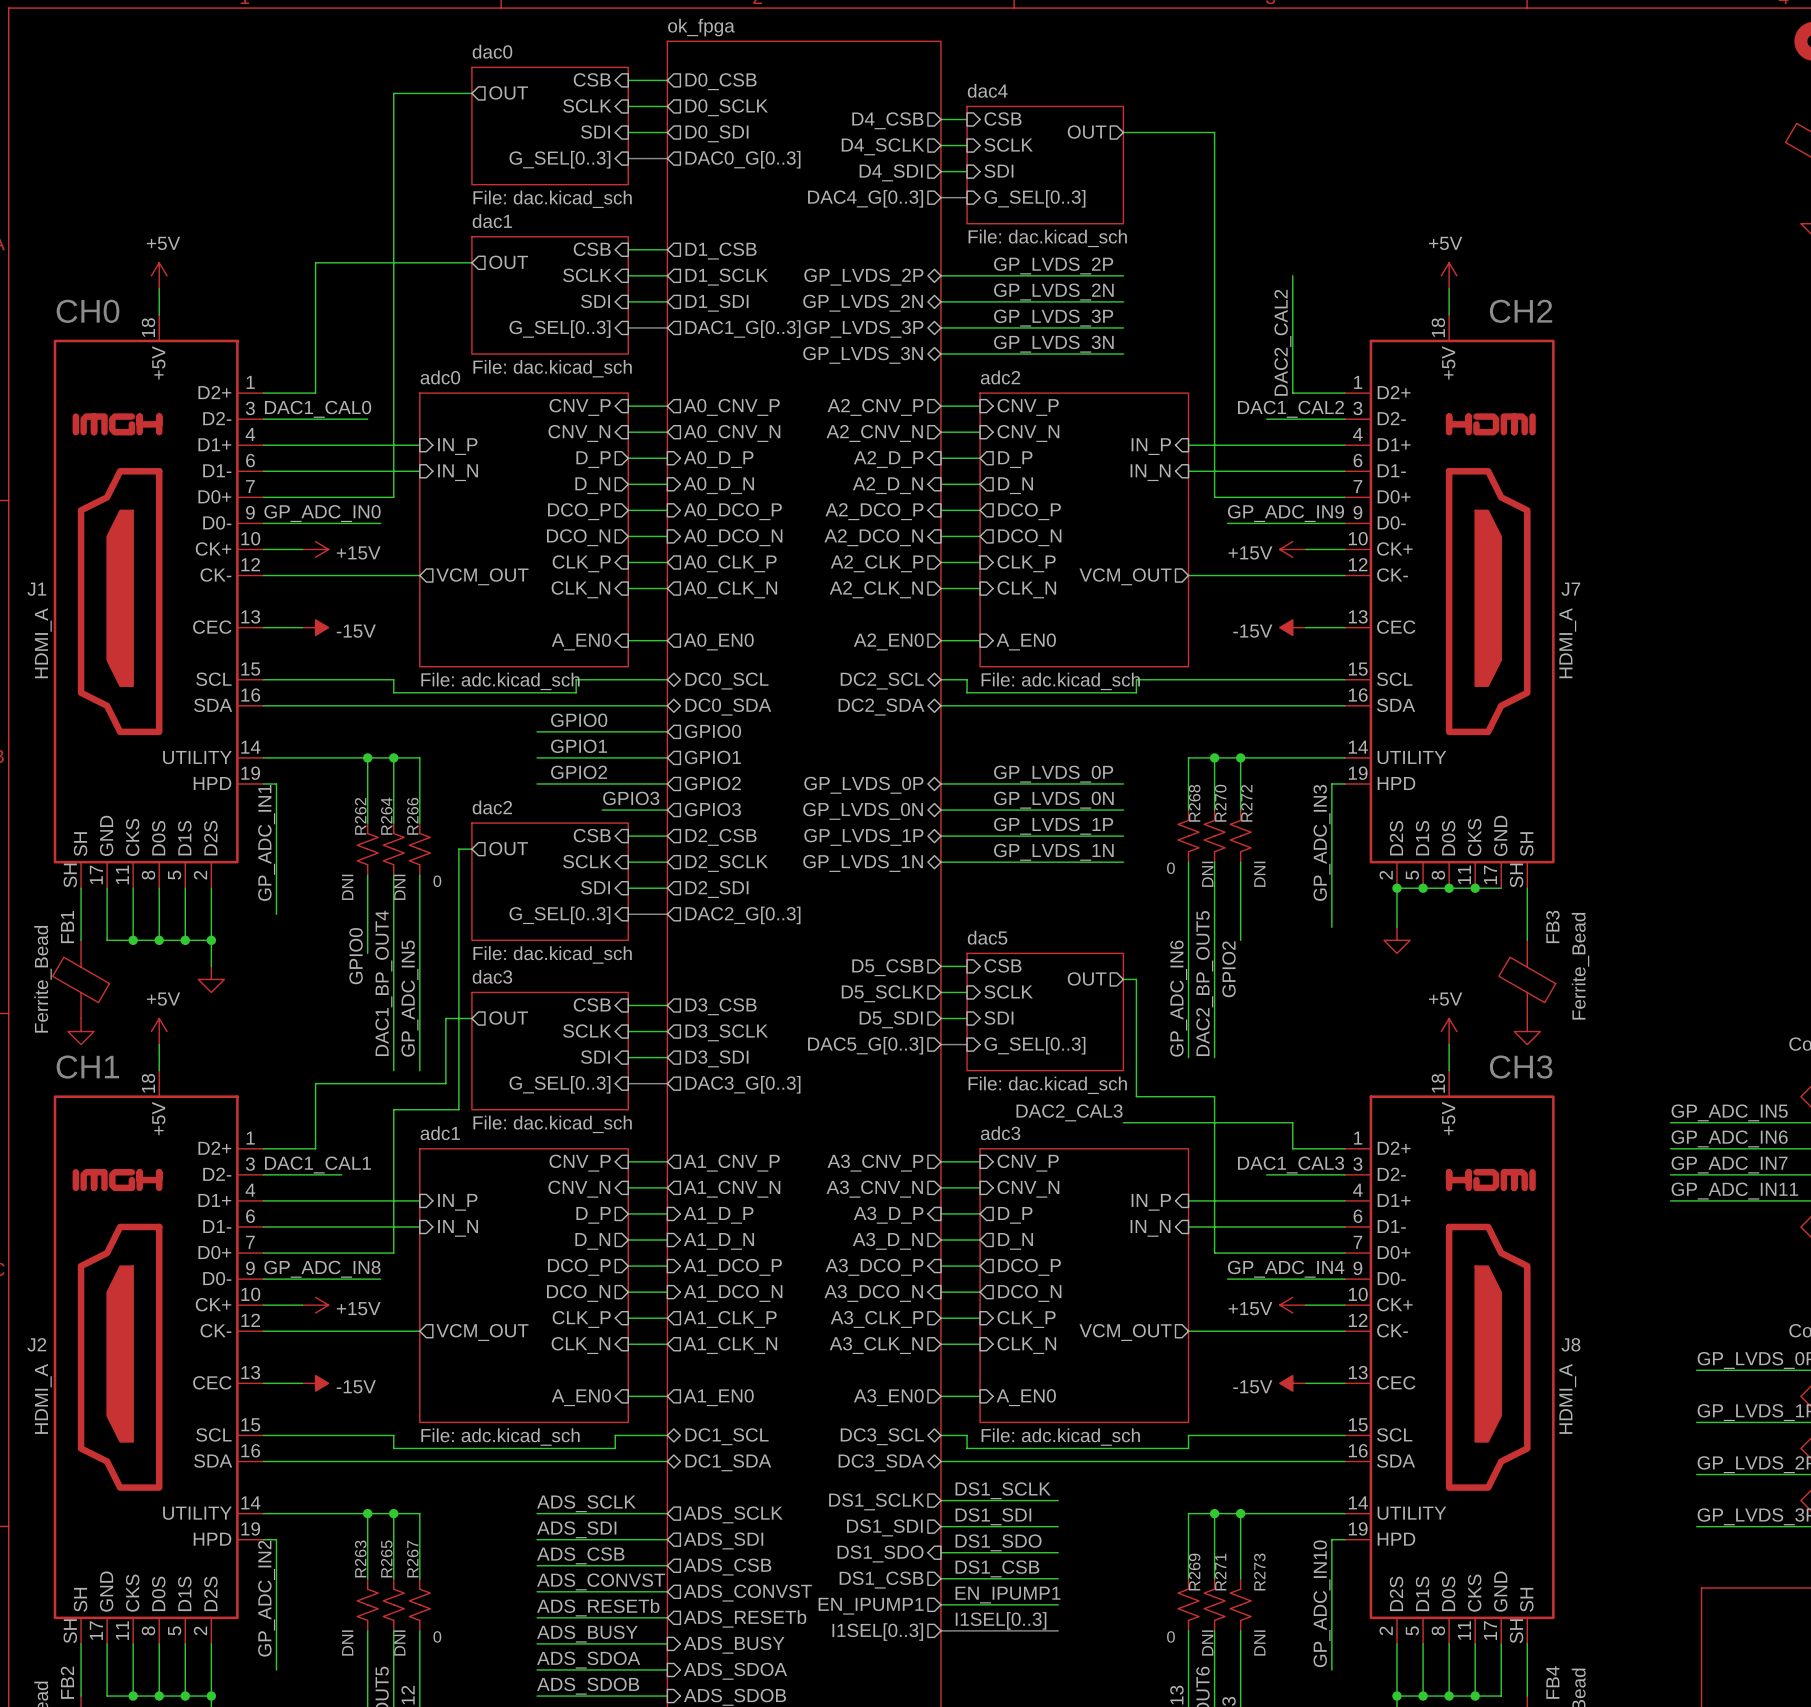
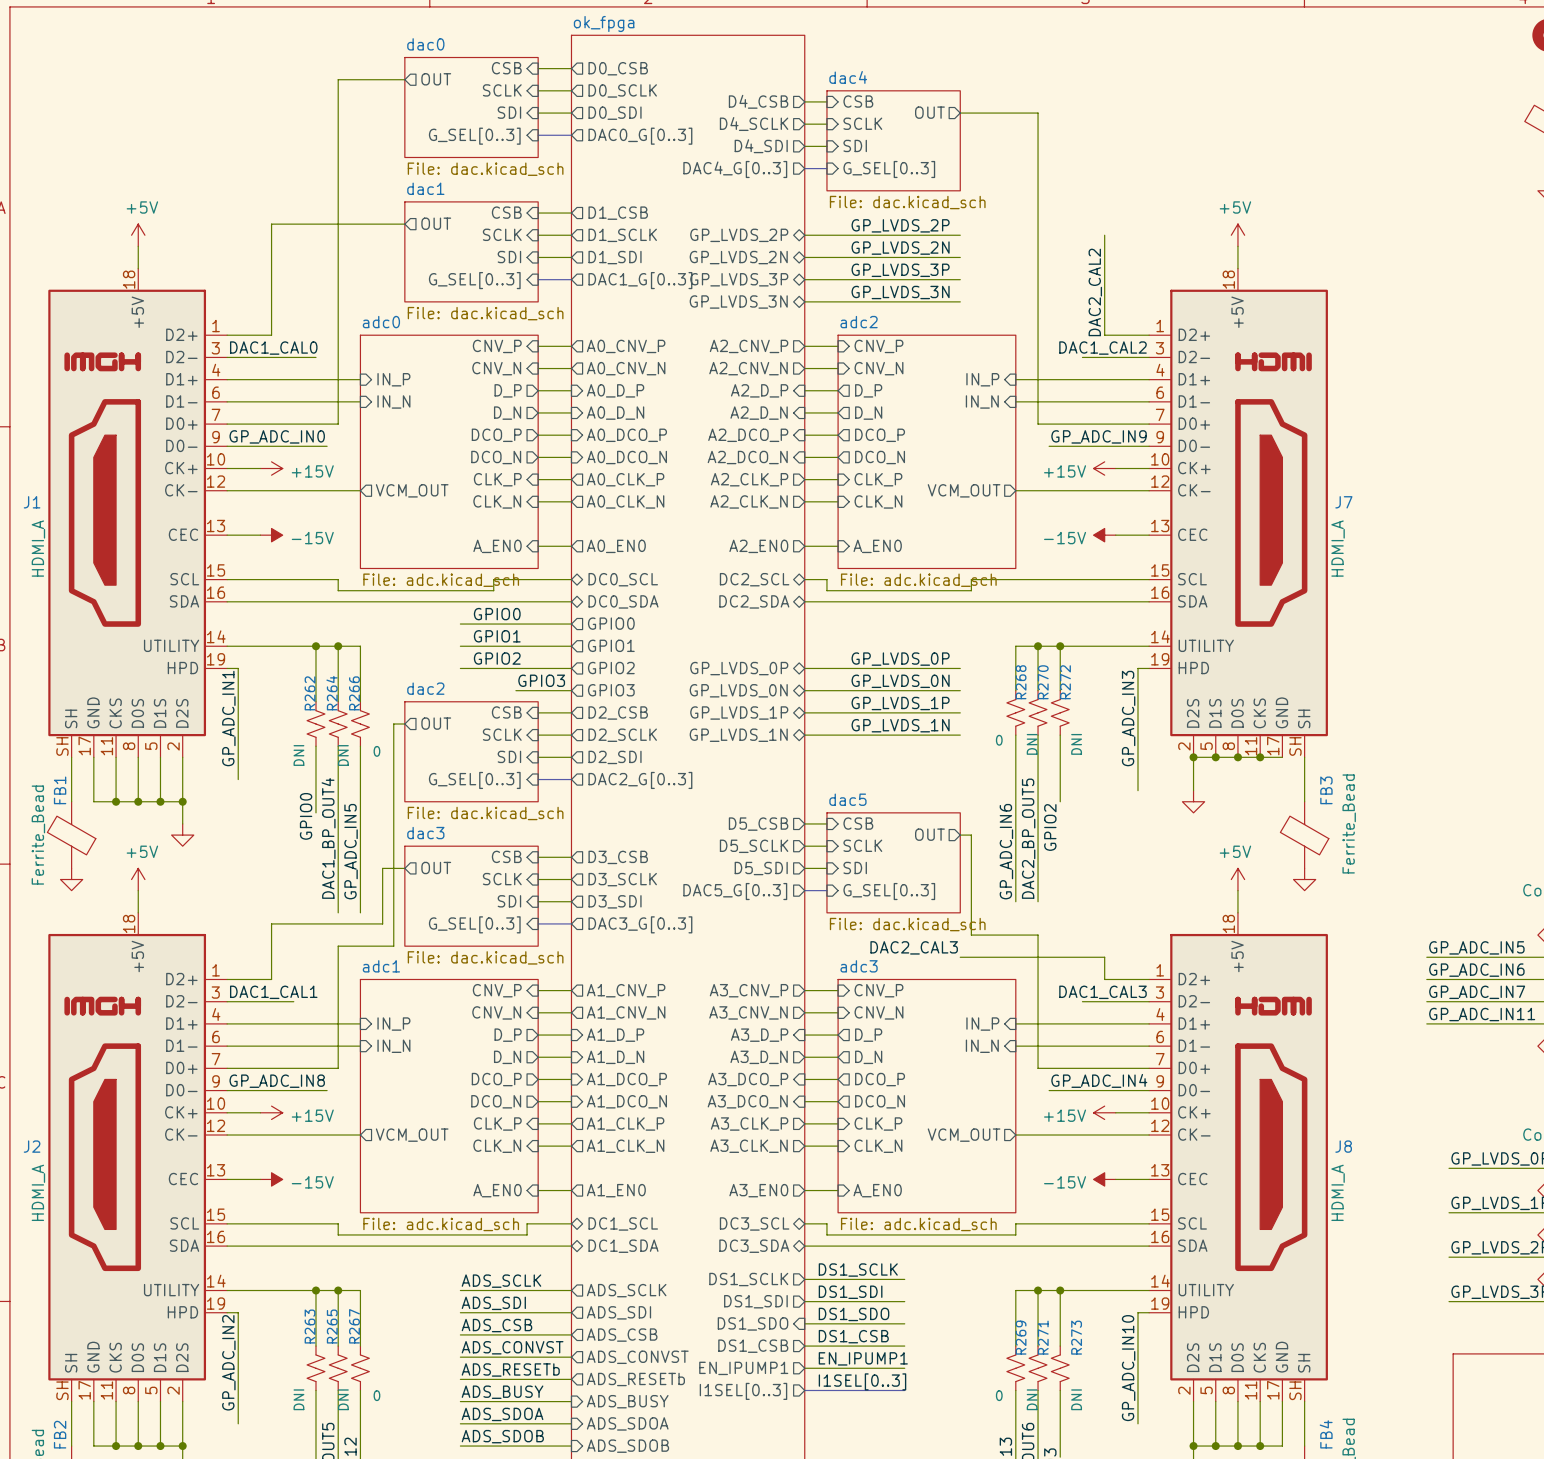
text: CH0 (87, 311) -> none
text: CH2 (1521, 311) -> none
text: CH1 (87, 1067) -> none
text: CH3 (1521, 1067) -> none

